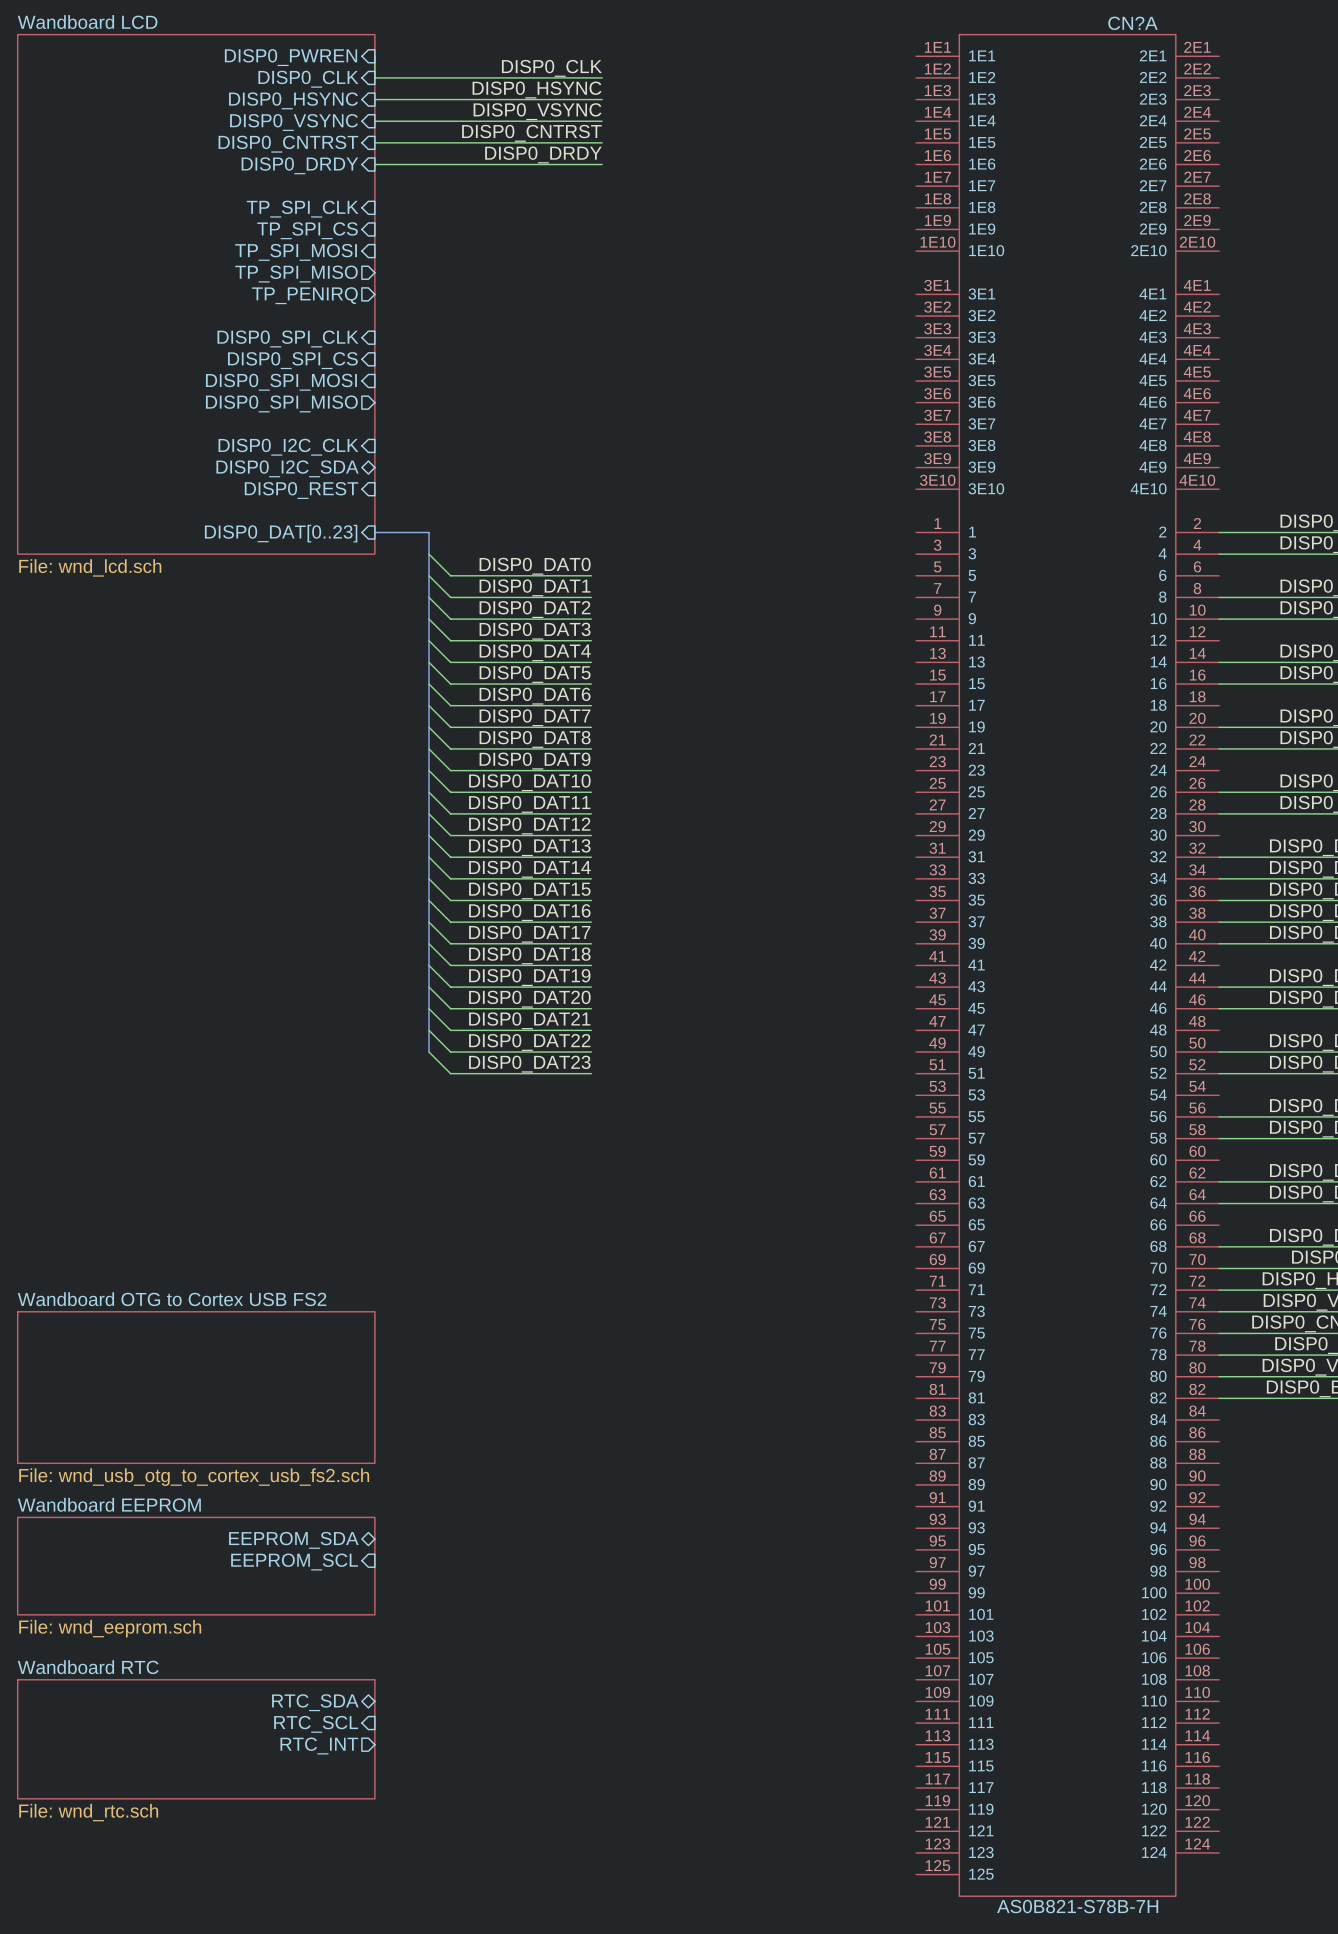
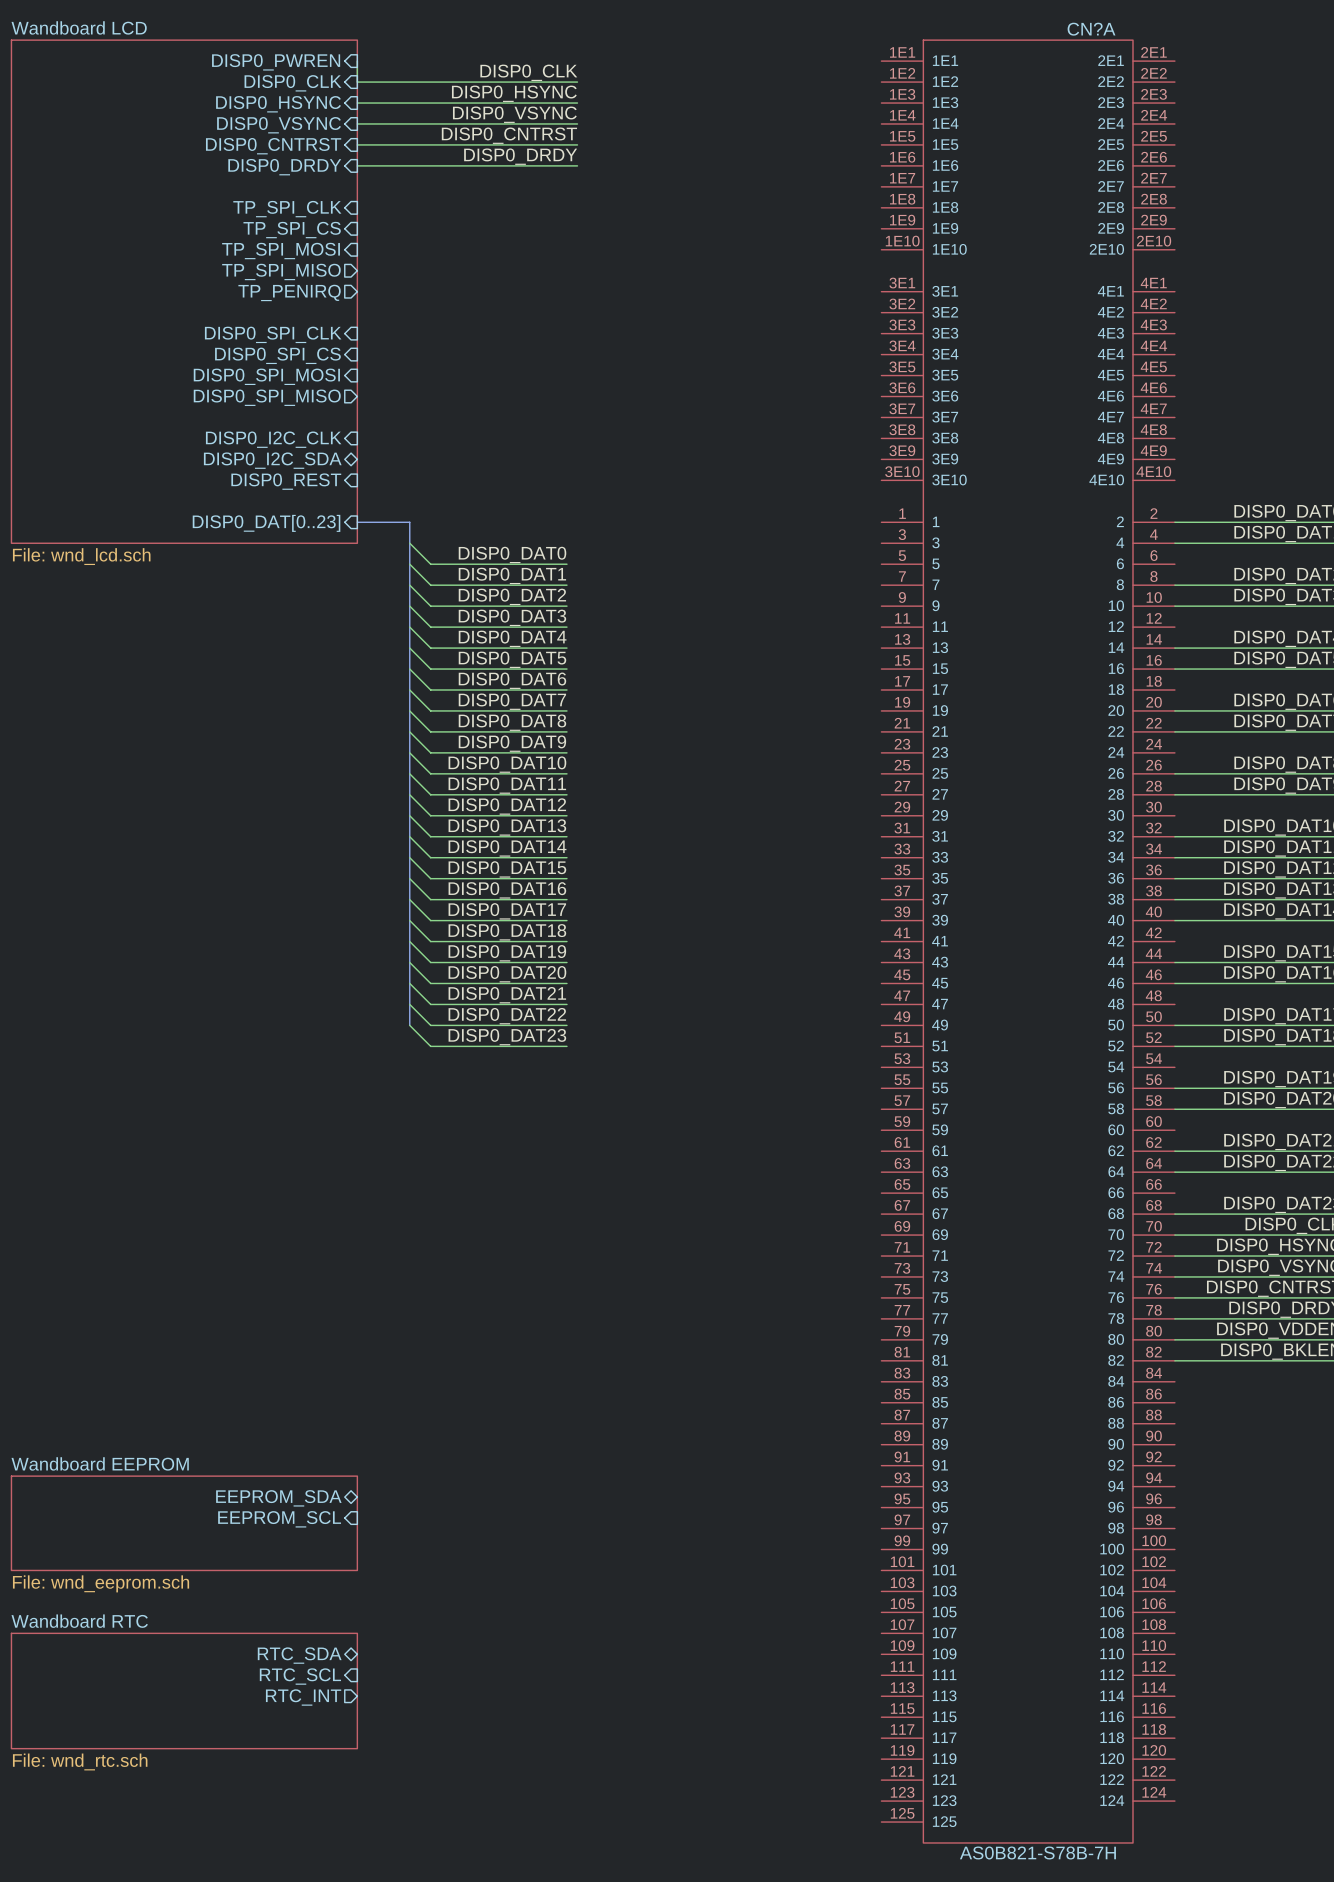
sheet Wandboard OTG to Cortex USB FS2: File: wnd_usb_otg_to_cortex_usb_fs2.sch (196, 1387) -> none

